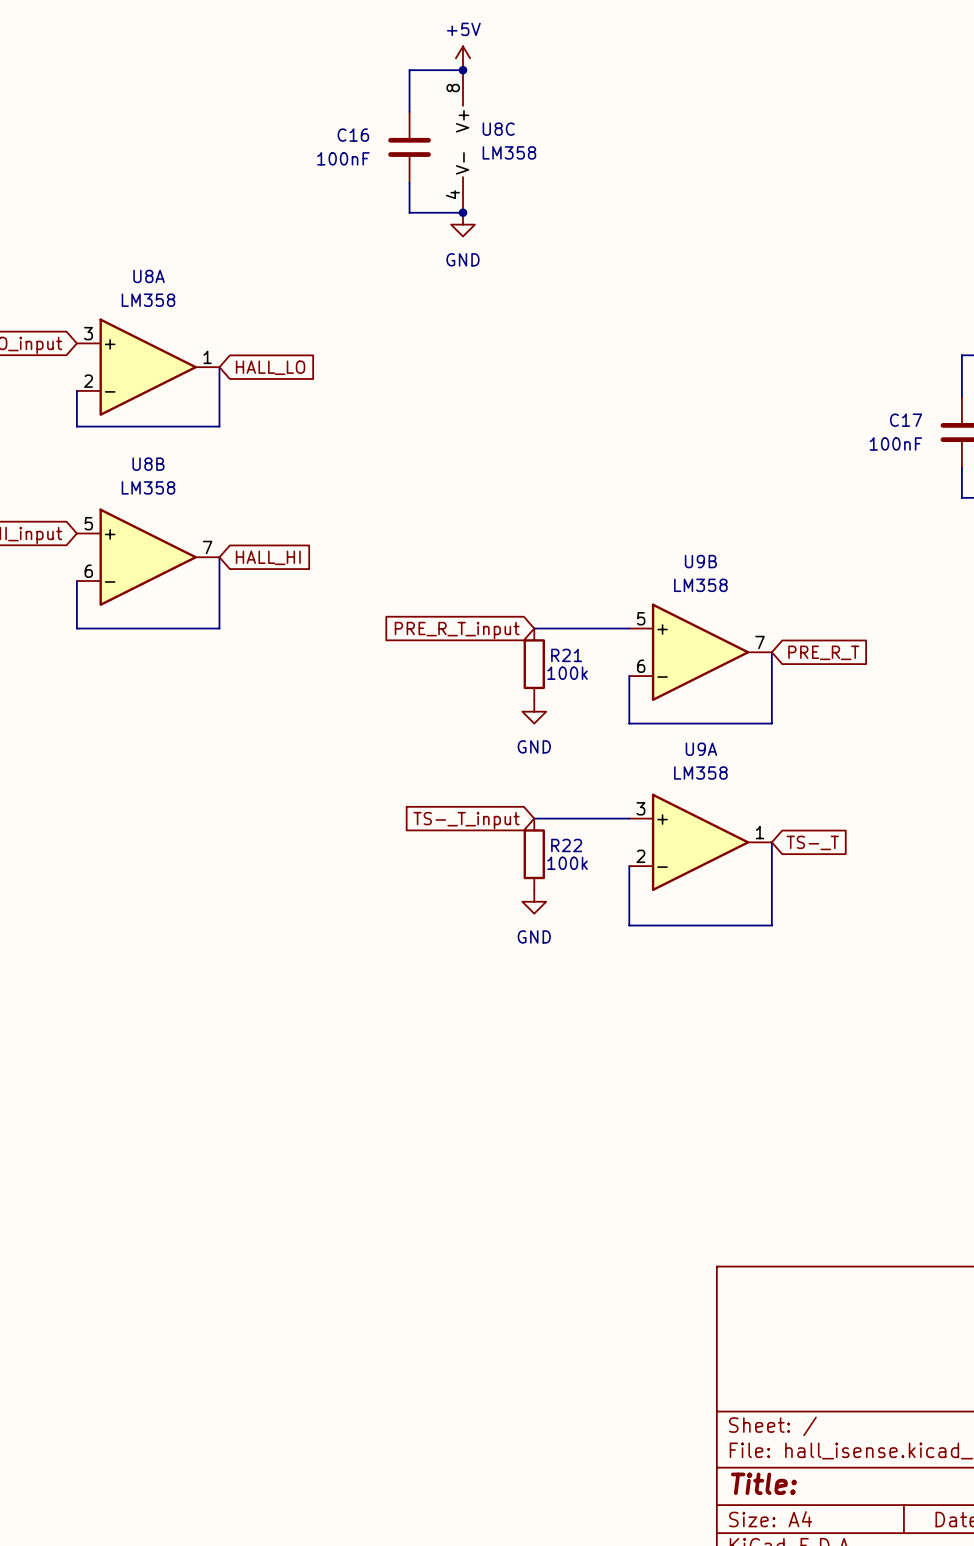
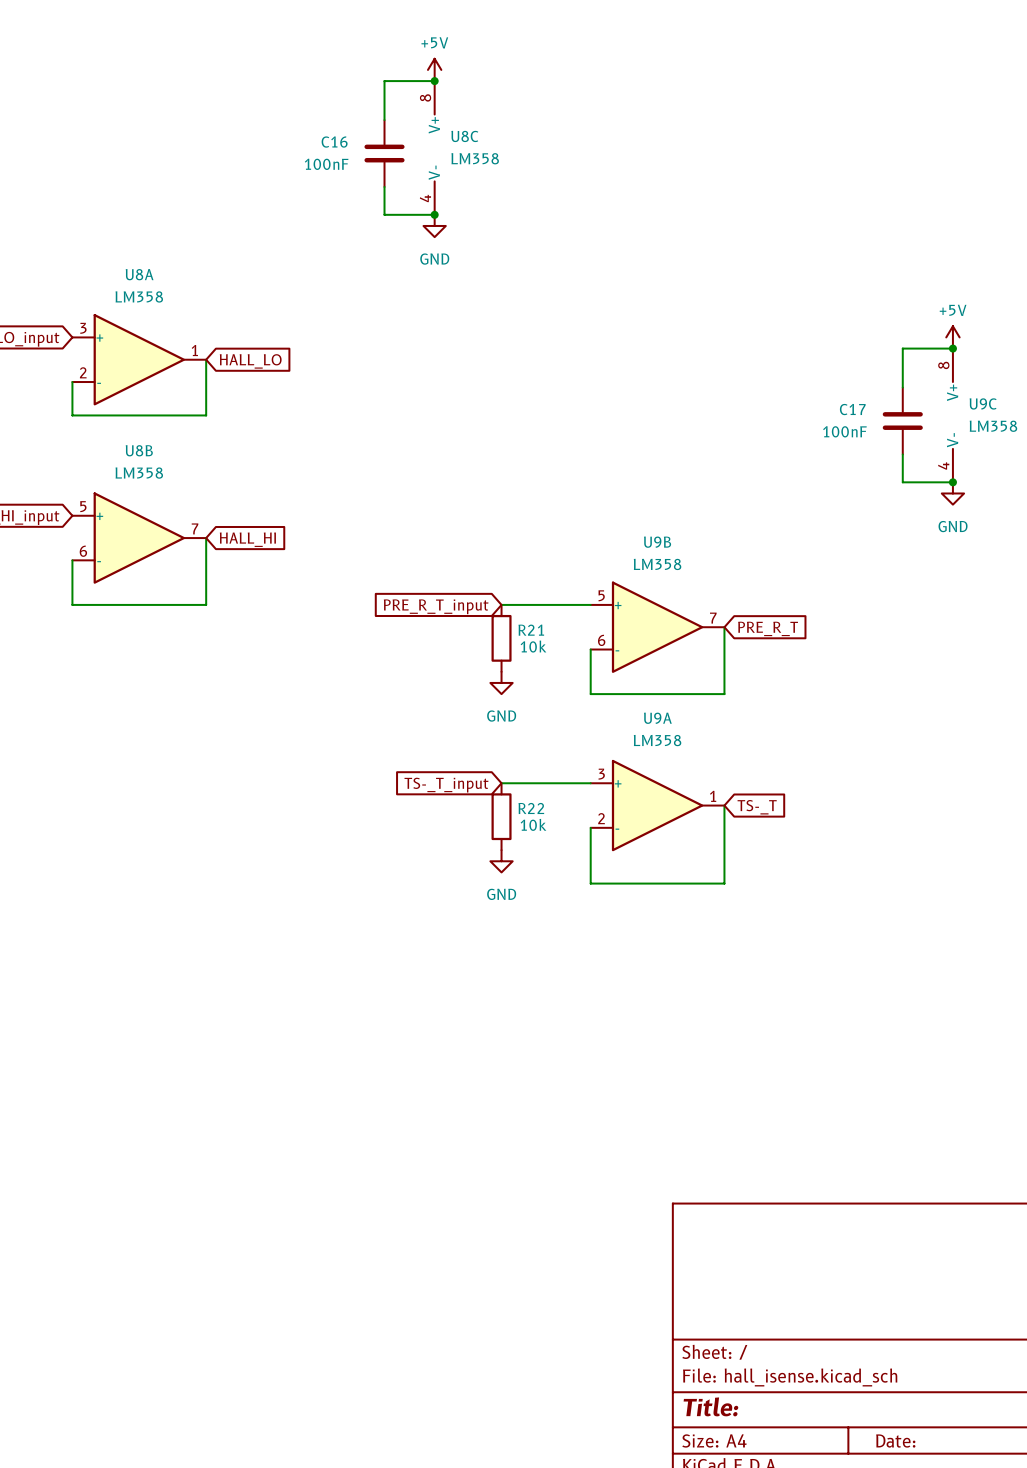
R21 value: 100k (567, 673) -> 10k (533, 646)
R22 value: 100k (567, 863) -> 10k (533, 824)

